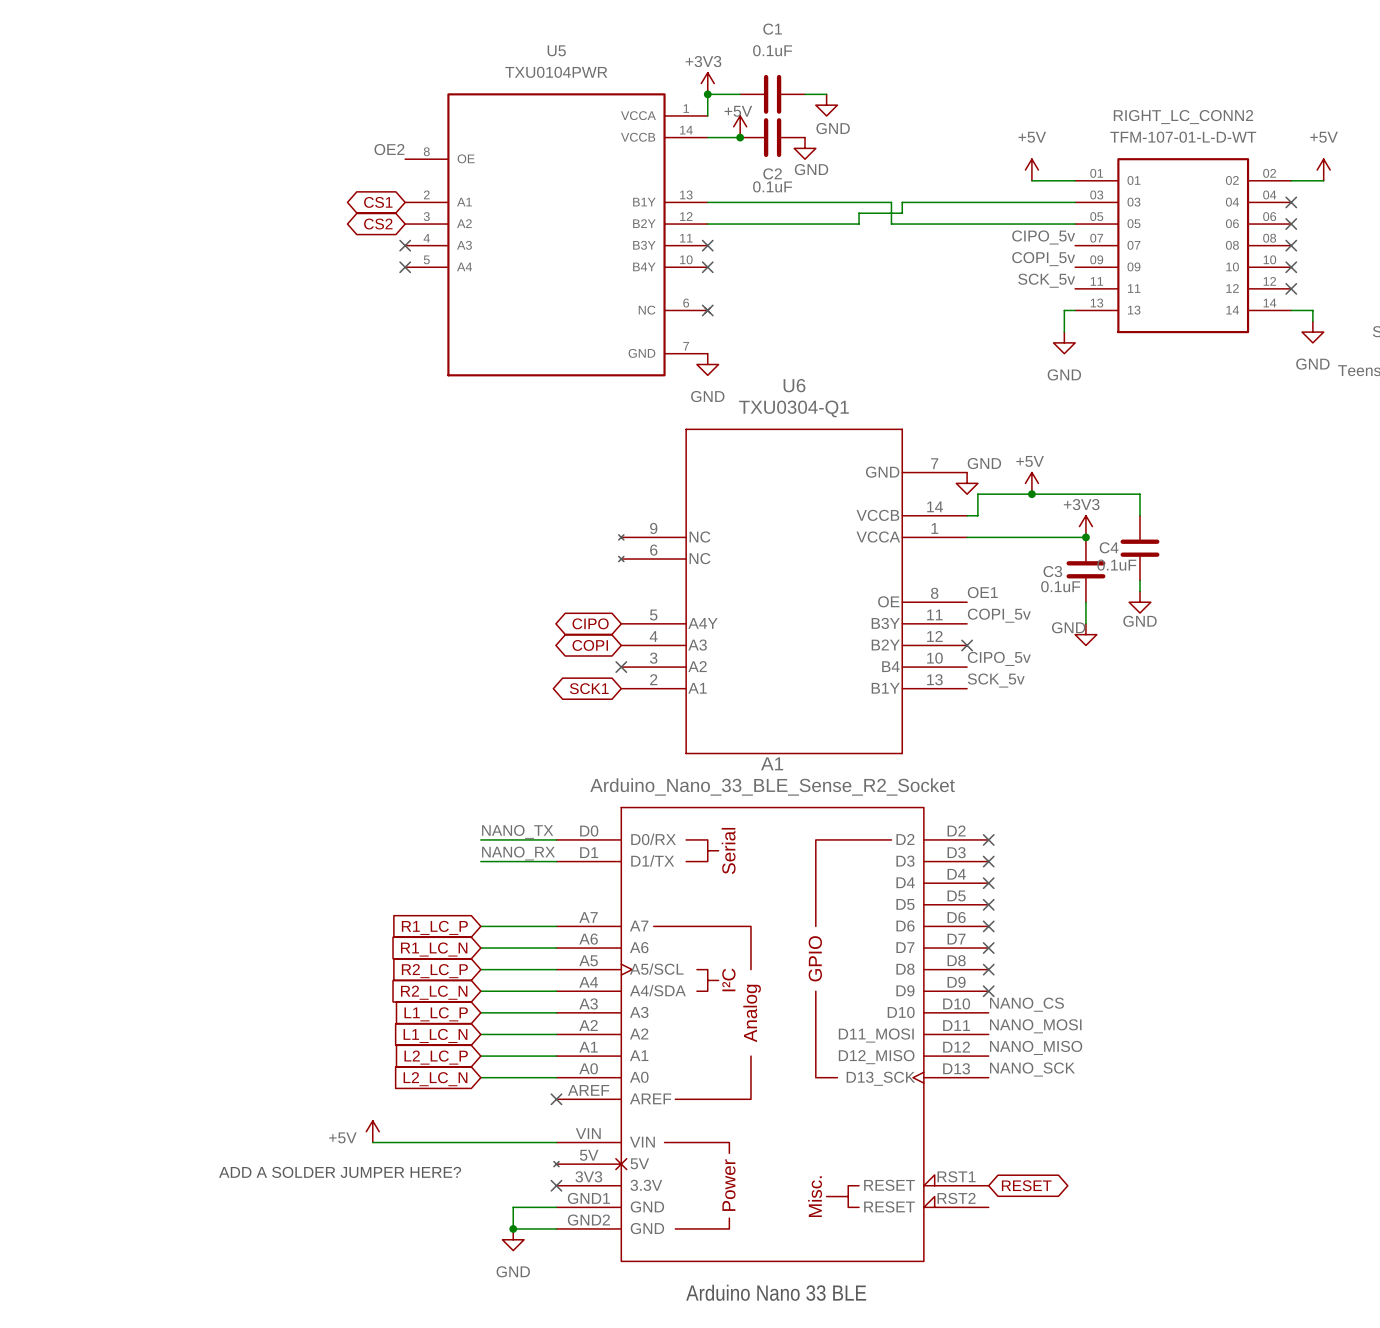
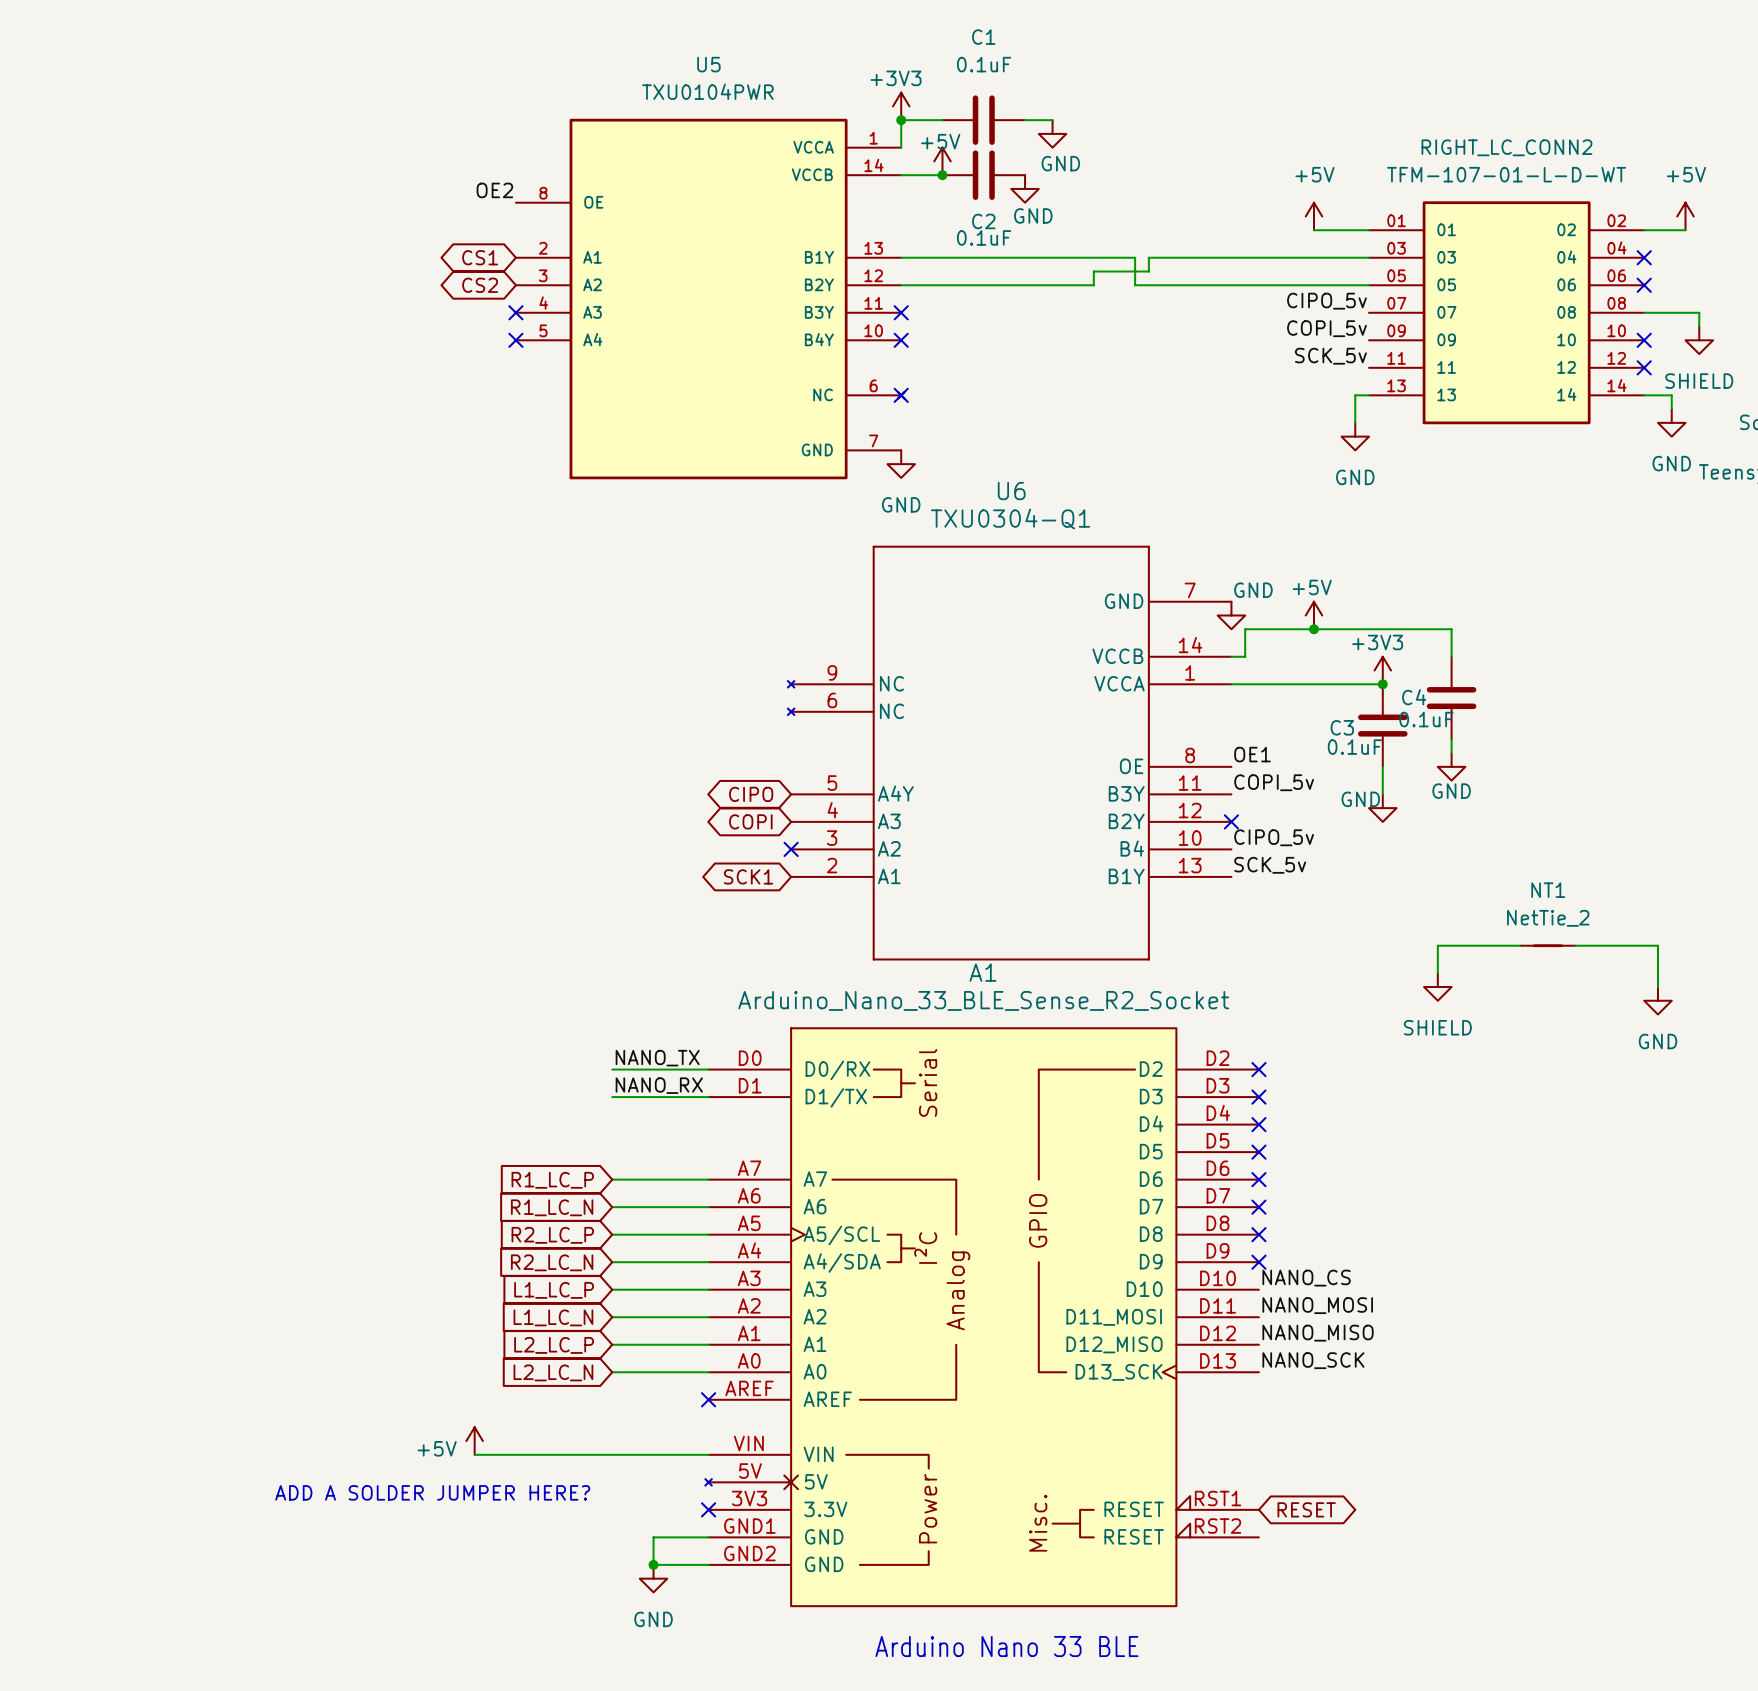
wire: none -> (1644, 312) (1699, 312) (1699, 326)
no-connect mark: (1291, 245) -> none
power symbol: none -> SHIELD (1699, 340)
wire: none -> (1520, 945) (1437, 945) (1437, 973)
NT1: none -> NetTie_2 (1547, 945)
wire: none -> (1575, 945) (1657, 945) (1657, 987)
power symbol: none -> SHIELD (1437, 987)
power symbol: none -> GND (1657, 1000)

